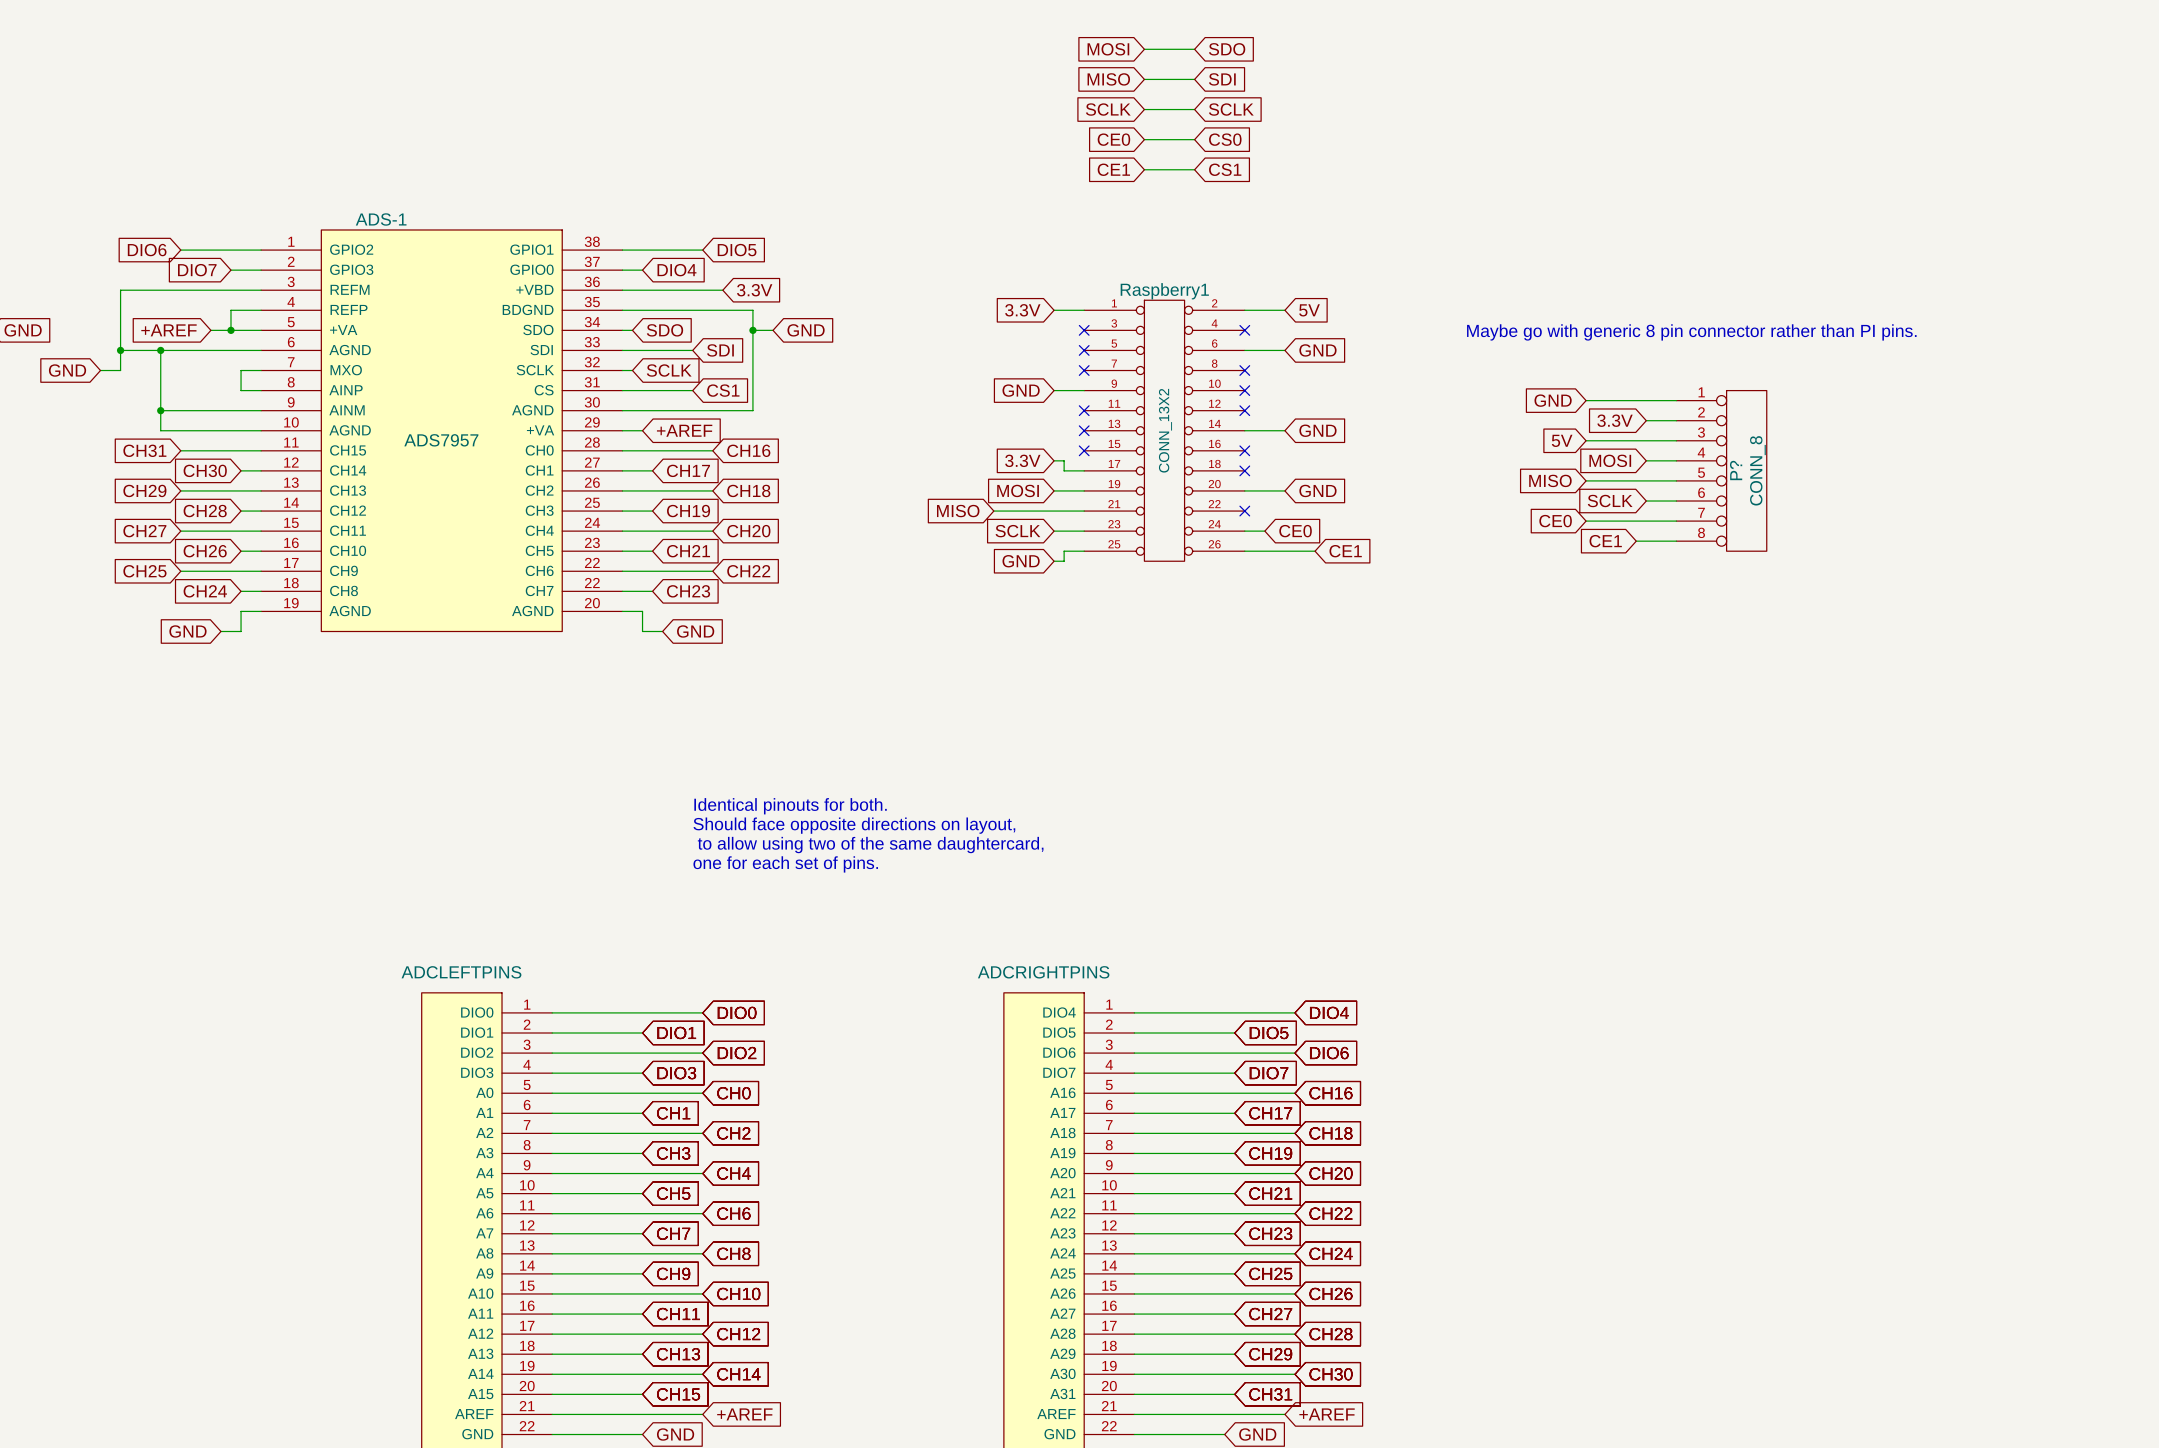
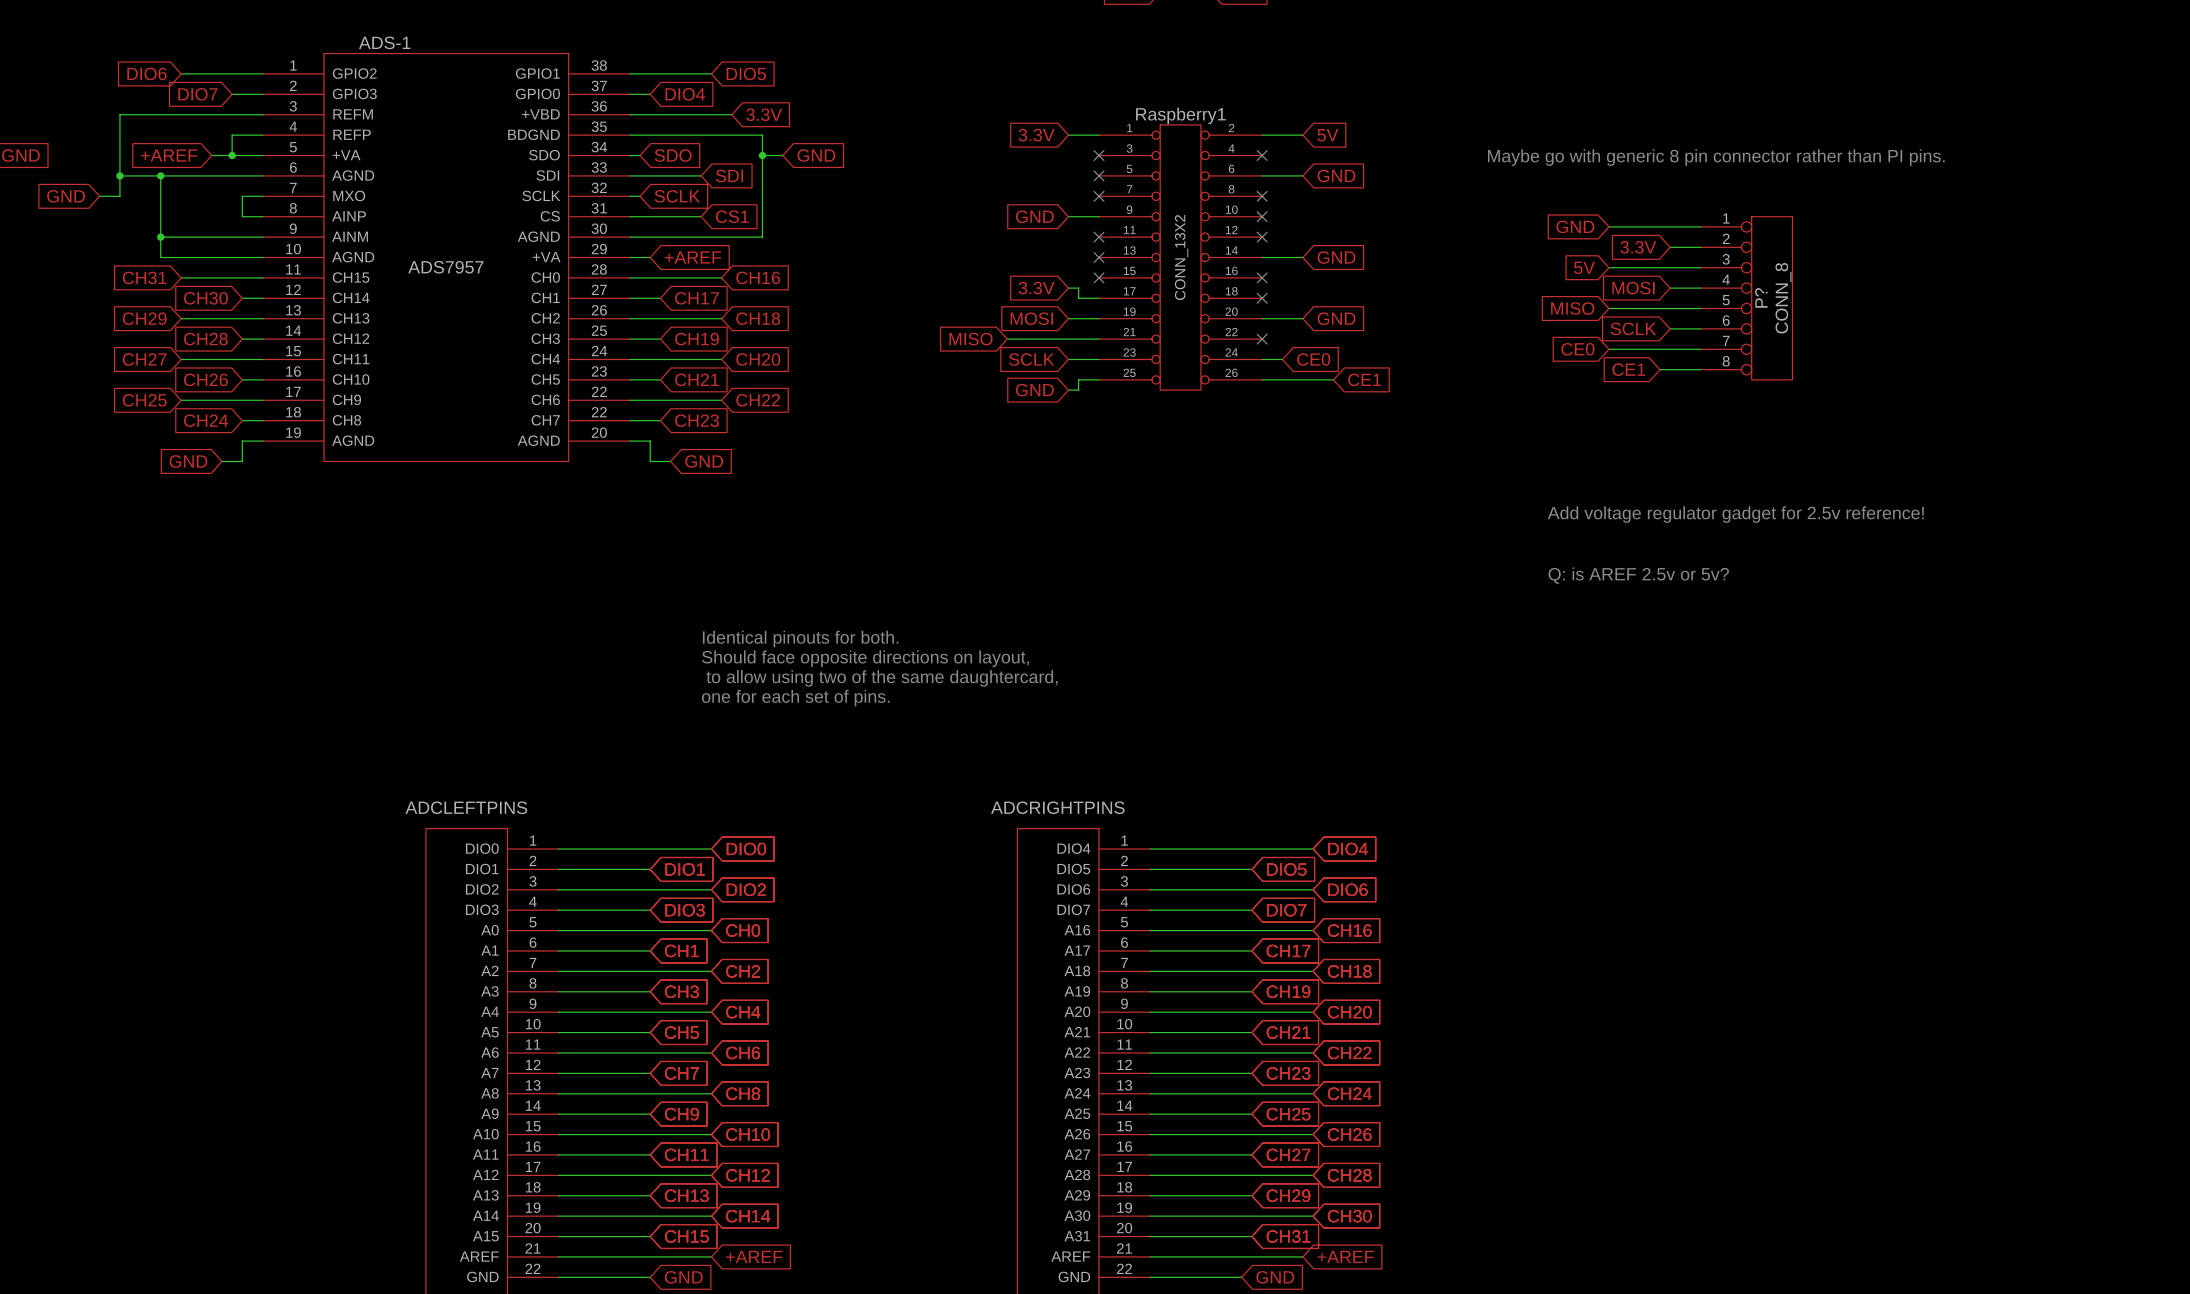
text: none -> Add voltage regulator gadget for 2.5v reference! (1735, 514)
text: none -> Q: is AREF 2.5v or 5v? (1638, 575)

